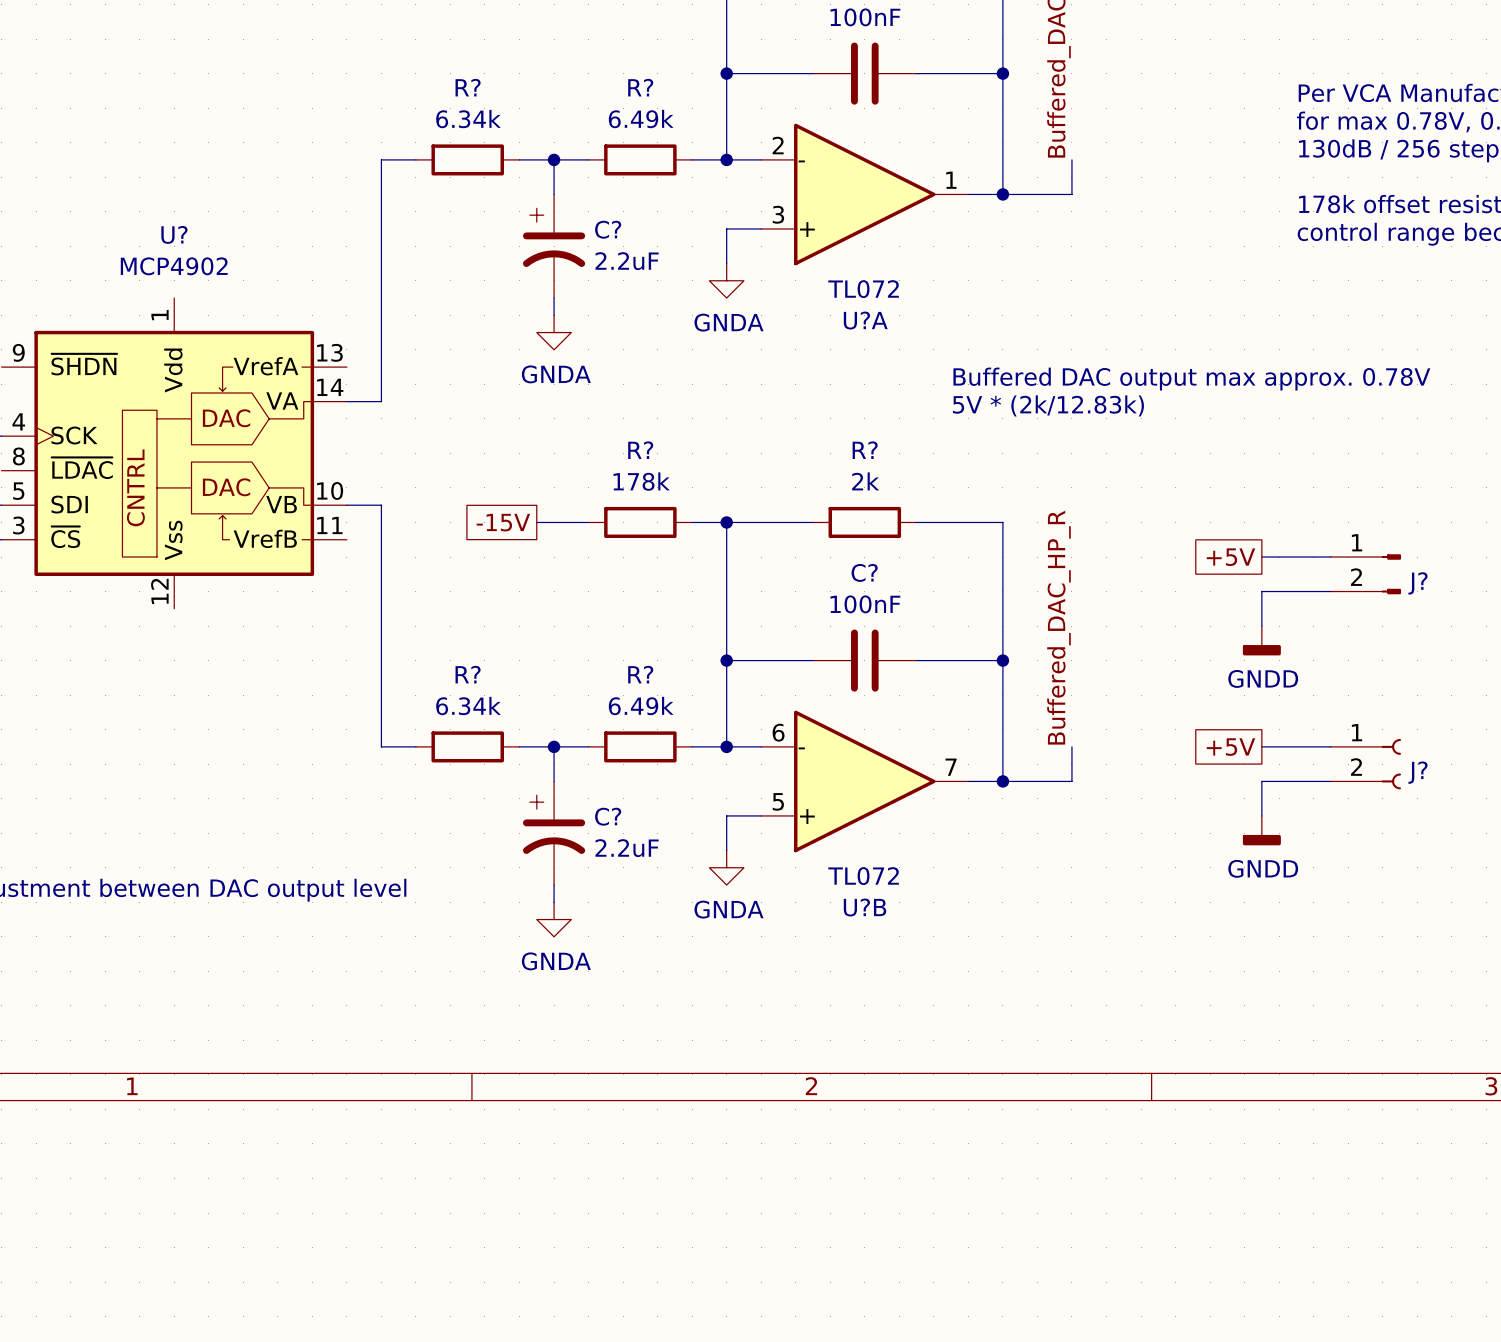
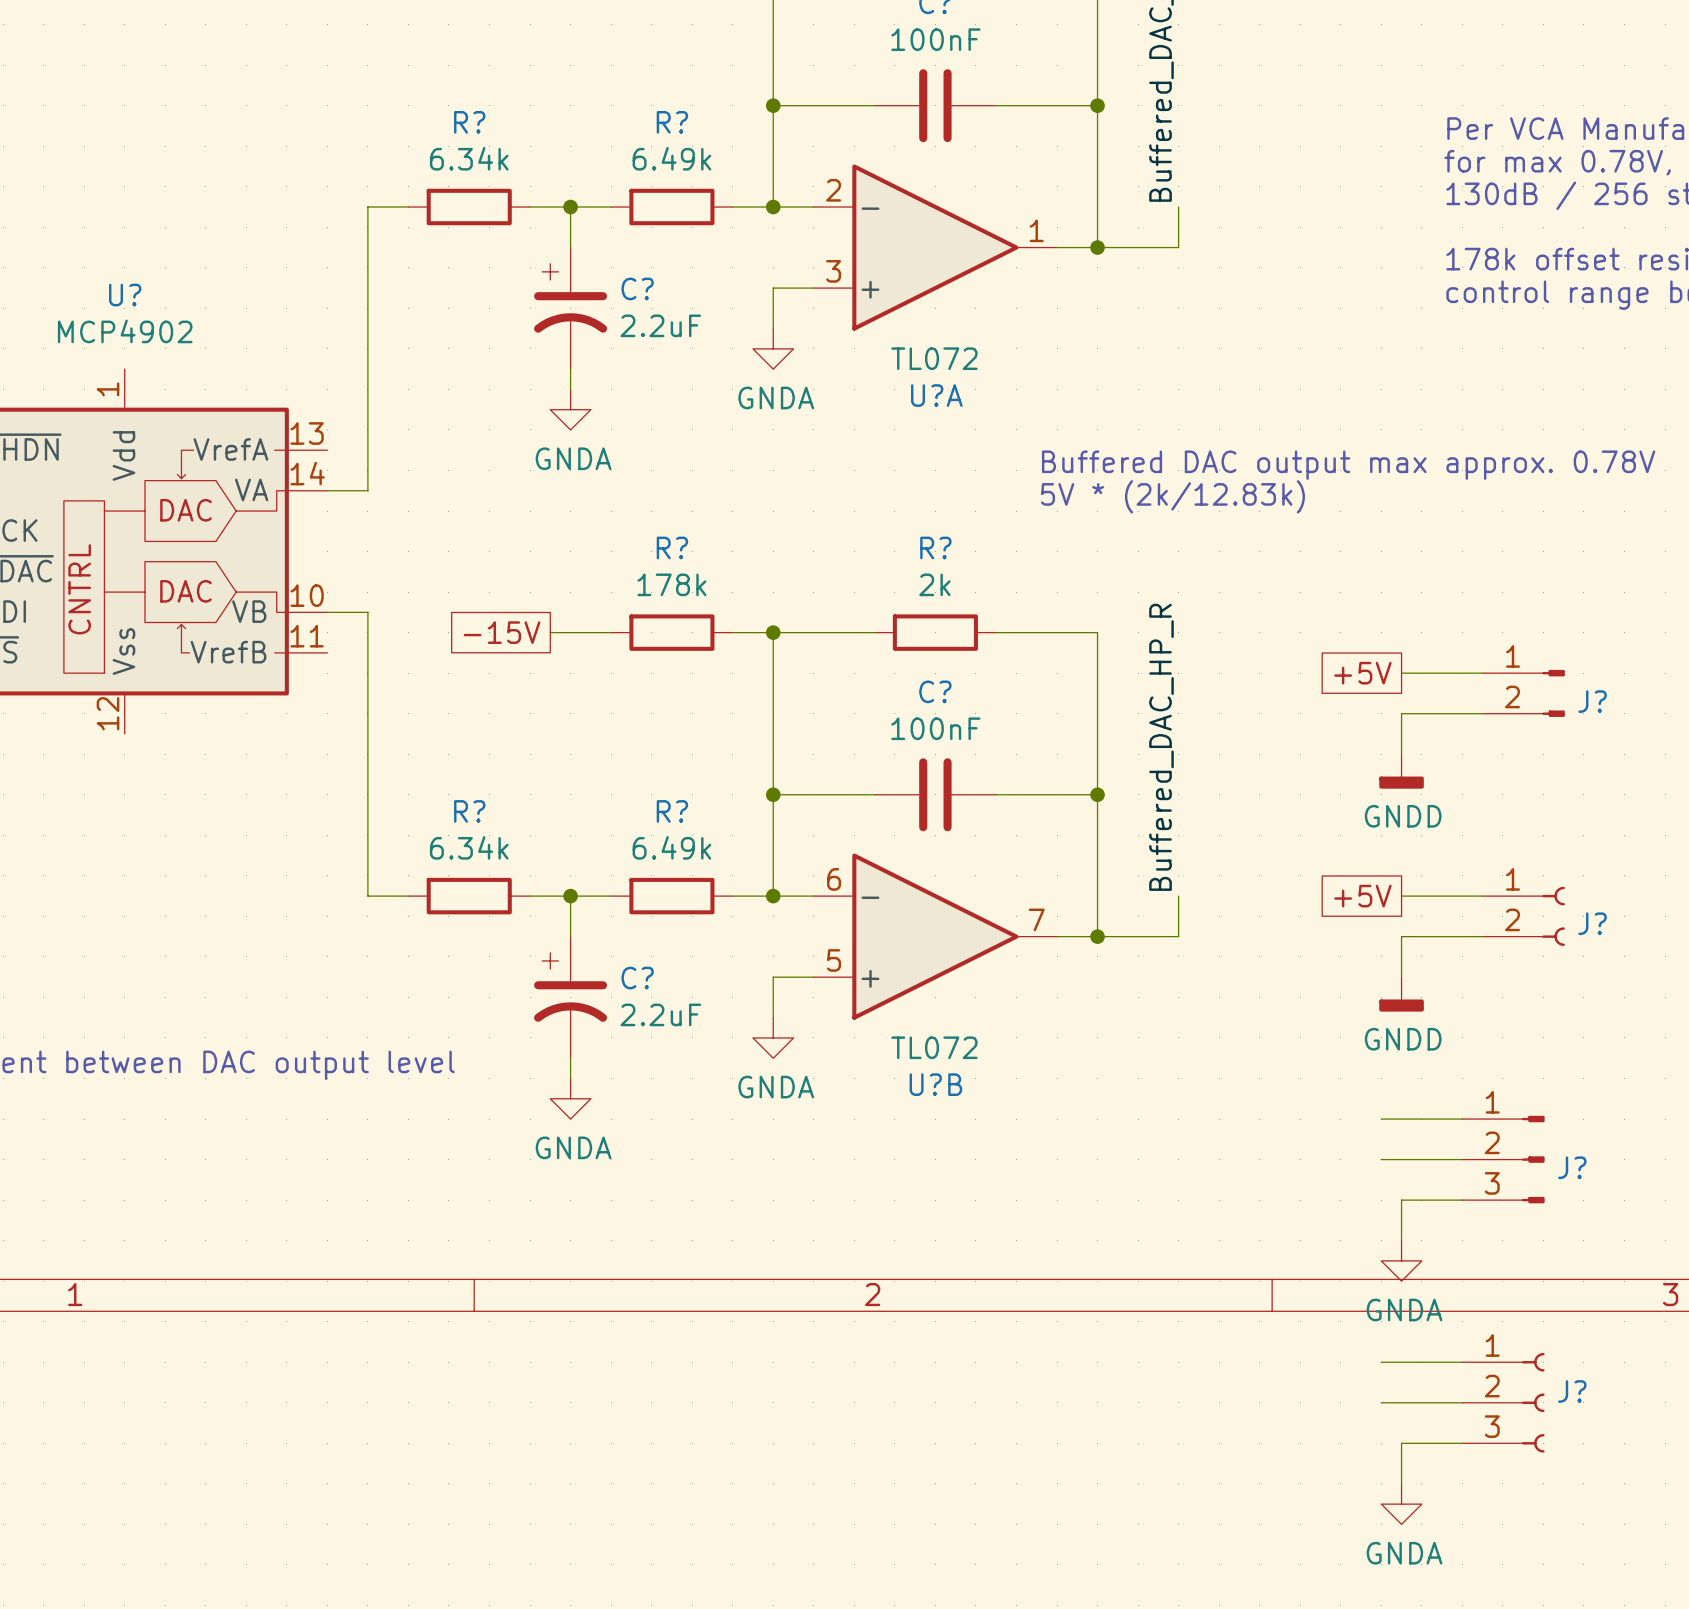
wire: none -> (1381, 1119) (1462, 1119)
wire: none -> (1381, 1159) (1462, 1159)
J?: none -> (1503, 1159)
wire: none -> (1462, 1200) (1401, 1200) (1401, 1240)
power symbol: none -> GNDA (1401, 1260)
wire: none -> (1381, 1362) (1462, 1362)
wire: none -> (1381, 1402) (1462, 1402)
J?: none -> (1503, 1402)
wire: none -> (1462, 1443) (1401, 1443) (1401, 1483)
power symbol: none -> GNDA (1401, 1504)

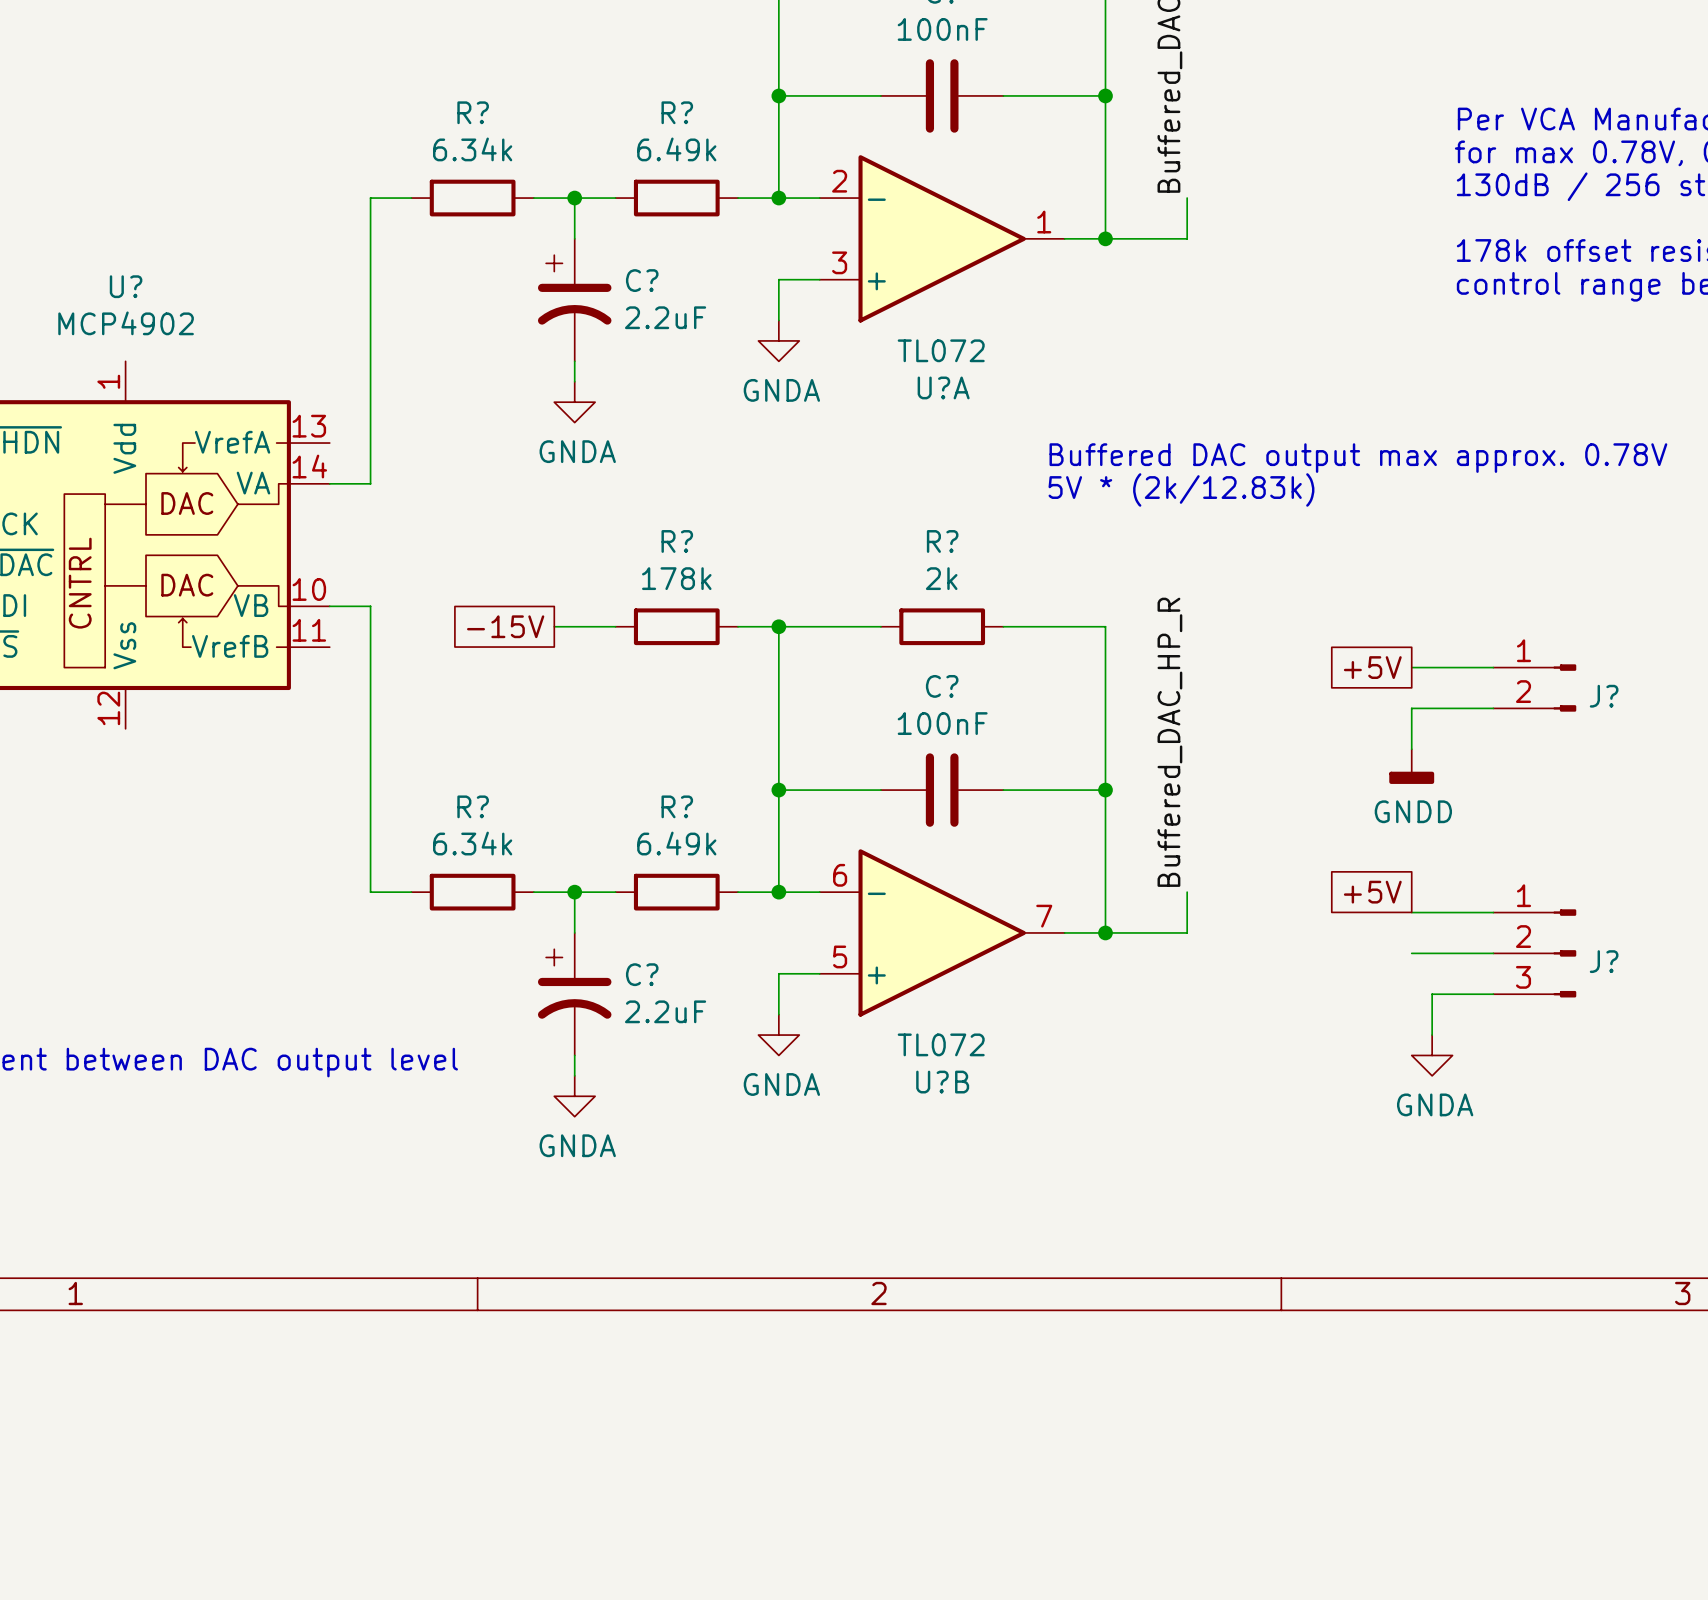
wire: (1401, 896) (1482, 896) -> none
J?: (1523, 916) -> none
wire: (1482, 936) (1401, 936) (1401, 977) -> none
power symbol: GNDD (1401, 994) -> none
wire: (1381, 1119) (1462, 1119) -> (1411, 912) (1493, 912)
wire: (1381, 1159) (1462, 1159) -> (1411, 953) (1493, 953)
J? position: (1503, 1159) -> (1534, 953)
wire: (1462, 1200) (1401, 1200) (1401, 1240) -> (1493, 994) (1432, 994) (1432, 1035)
power symbol position: GNDA (1401, 1260) -> GNDA (1432, 1055)
wire: (1381, 1362) (1462, 1362) -> none
wire: (1381, 1402) (1462, 1402) -> none
J?: (1503, 1402) -> none
wire: (1462, 1443) (1401, 1443) (1401, 1483) -> none
power symbol: GNDA (1401, 1504) -> none

